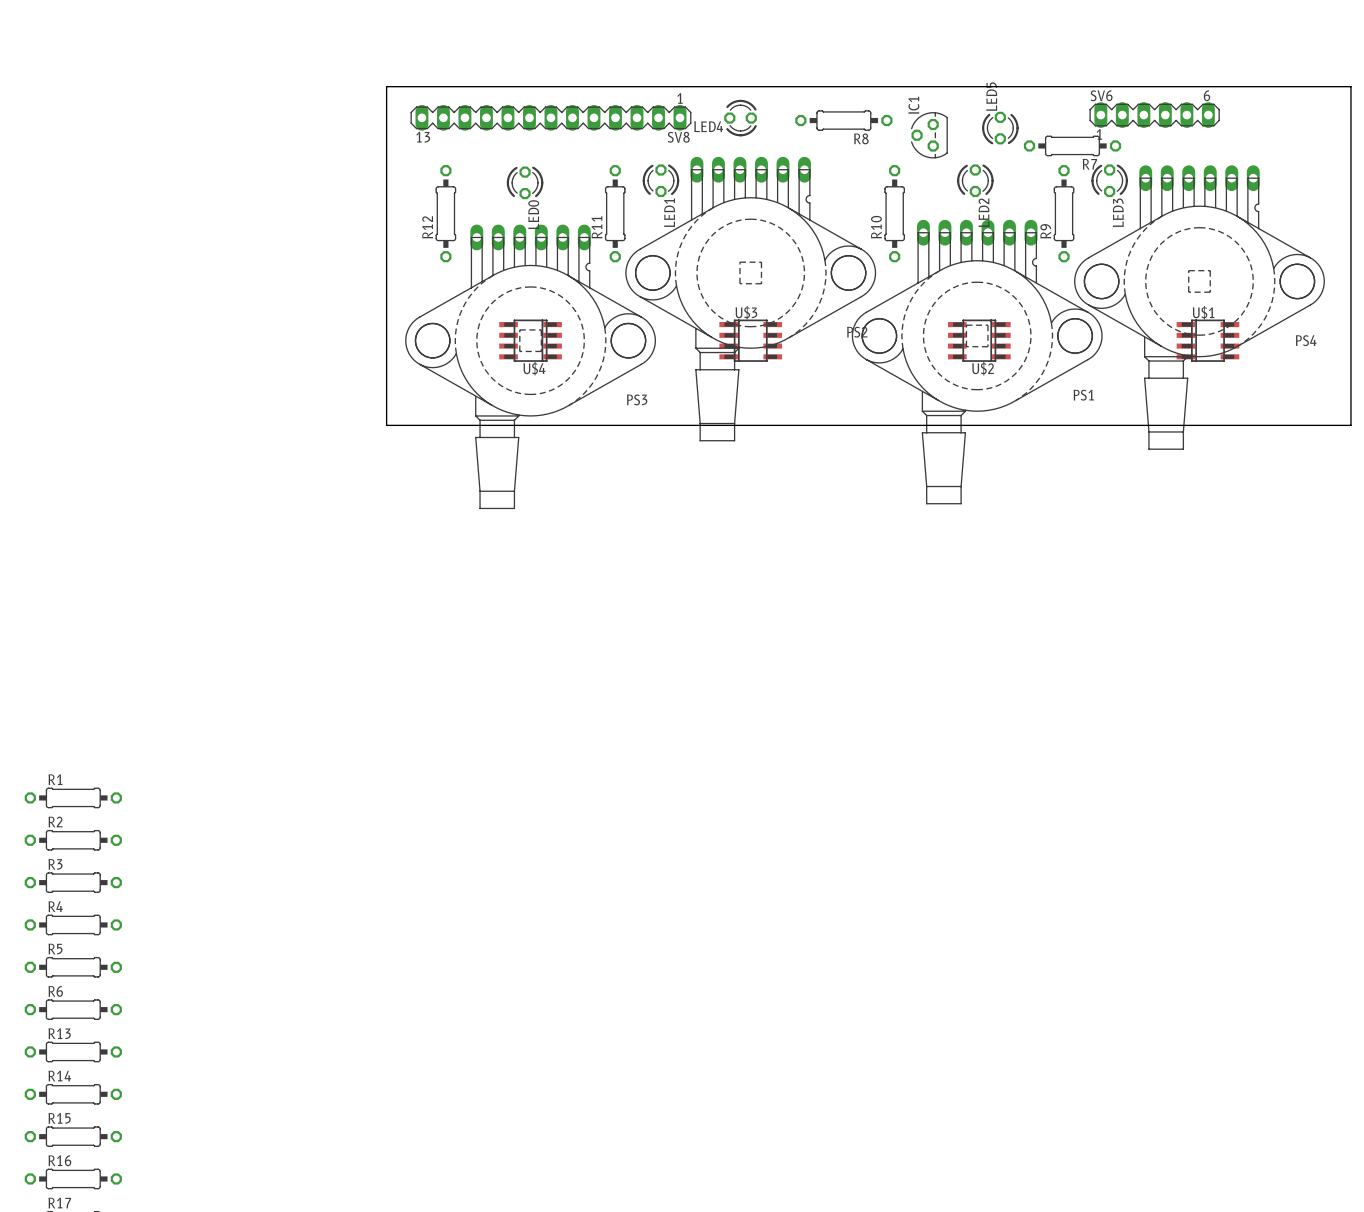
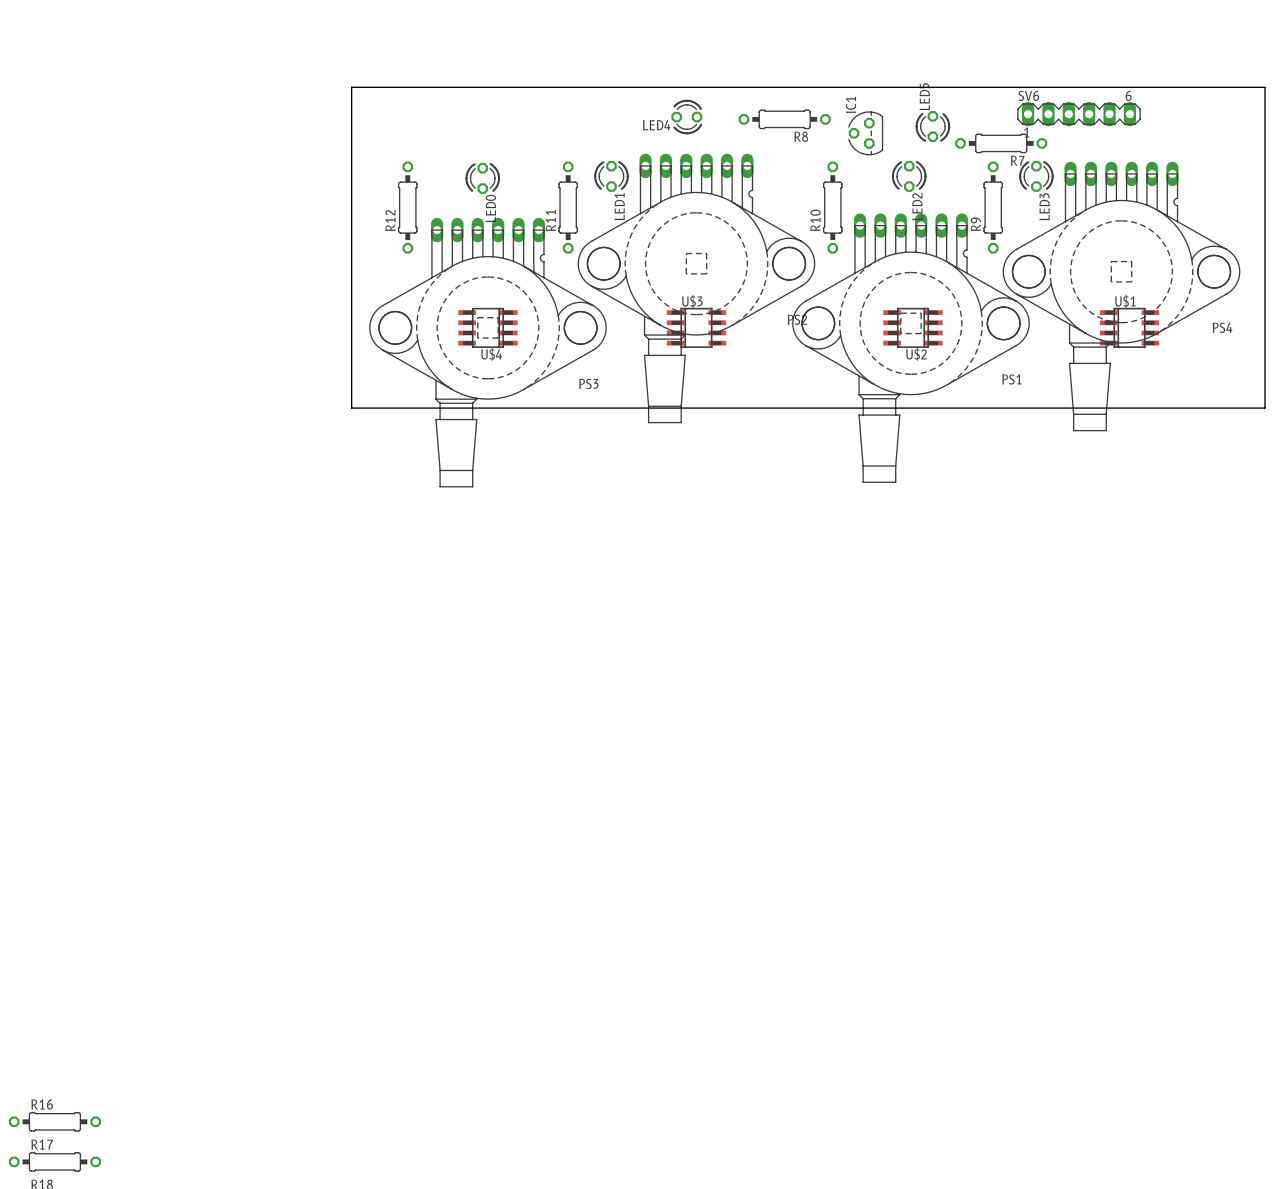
SV8: (550, 117) -> none
R1: (73, 797) -> none
R2: (73, 840) -> none
R3: (73, 882) -> none
R4: (73, 924) -> none
R5: (73, 967) -> none
R6: (73, 1009) -> none
R13: (73, 1051) -> none
R14: (73, 1094) -> none
R15: (73, 1136) -> none

